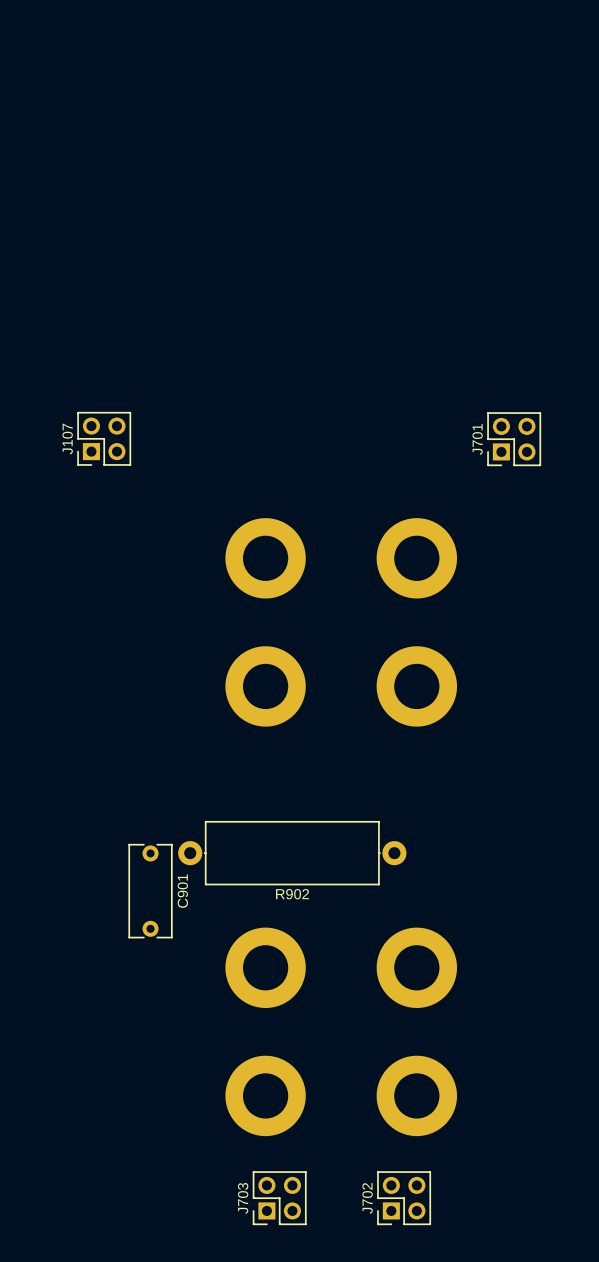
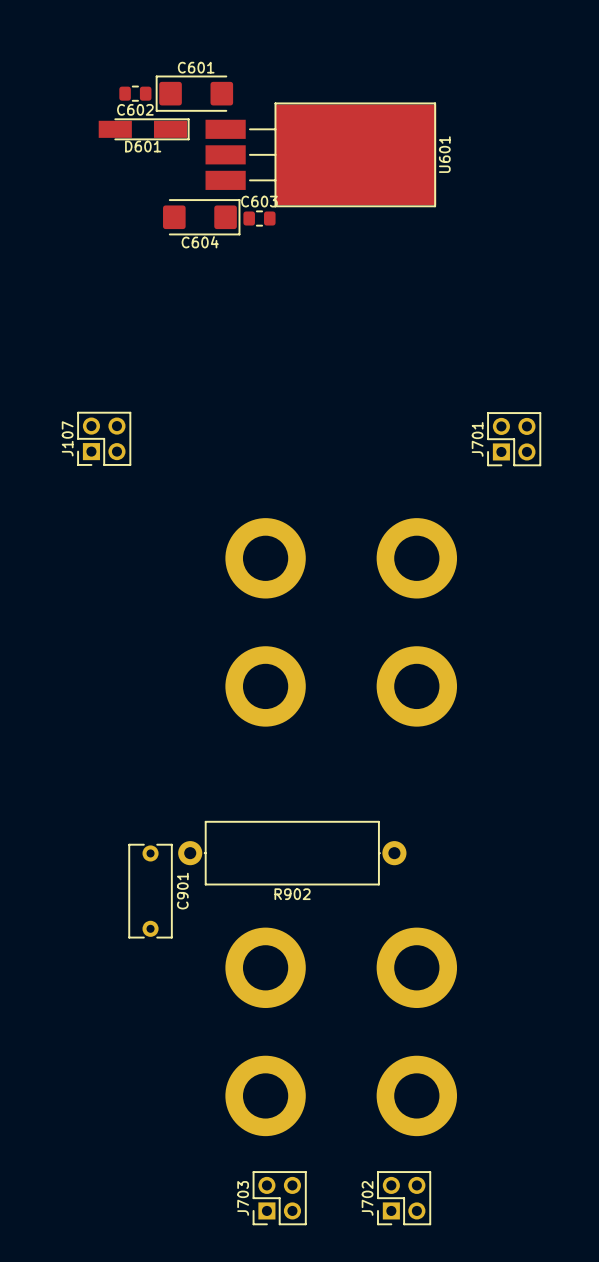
C602: none -> (135, 93)
C601: none -> (194, 93)
D601: none -> (143, 129)
U601: none -> (320, 154)
C604: none -> (201, 217)
C603: none -> (259, 218)

